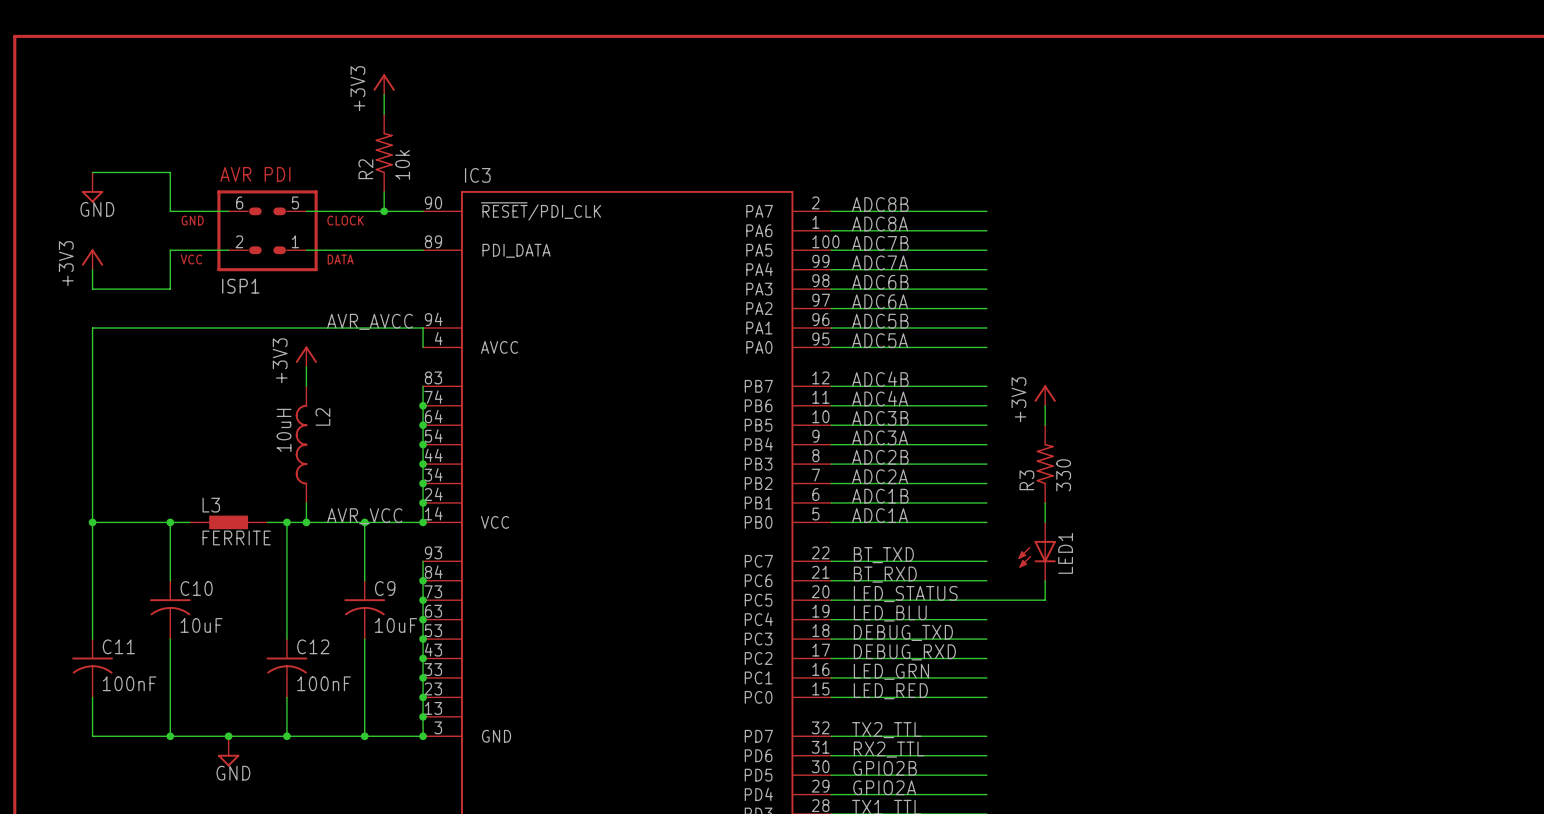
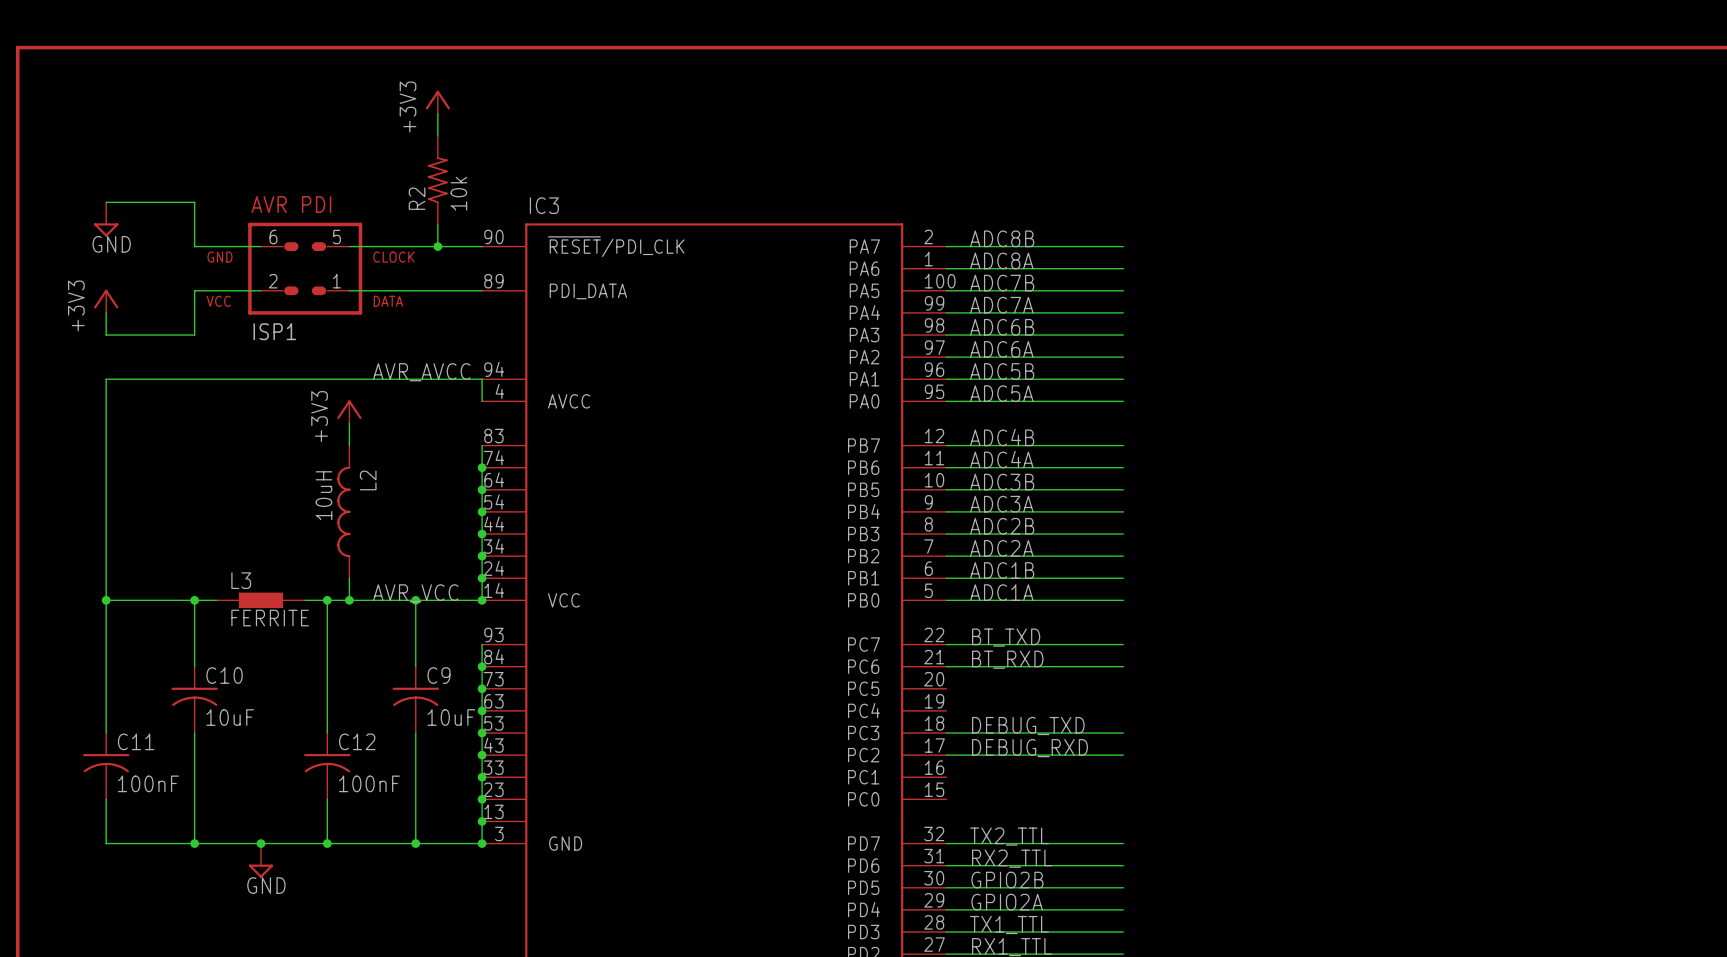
power symbol: +3V3 (1045, 395) -> none
wire: (1045, 405) (1045, 425) -> none
R3: 330 (1045, 464) -> none
wire: (1045, 502) (1045, 522) -> none
LED1: (1037, 551) -> none
wire: (1045, 580) (1045, 600) (831, 600) -> none
label: LED_STATUS (905, 594) -> none
label: LED_BLU (890, 613) -> none
wire: (831, 619) (986, 619) -> none
label: LED_GRN (891, 671) -> none
wire: (831, 677) (986, 677) -> none
label: LED_RED (890, 691) -> none
wire: (831, 697) (986, 697) -> none

